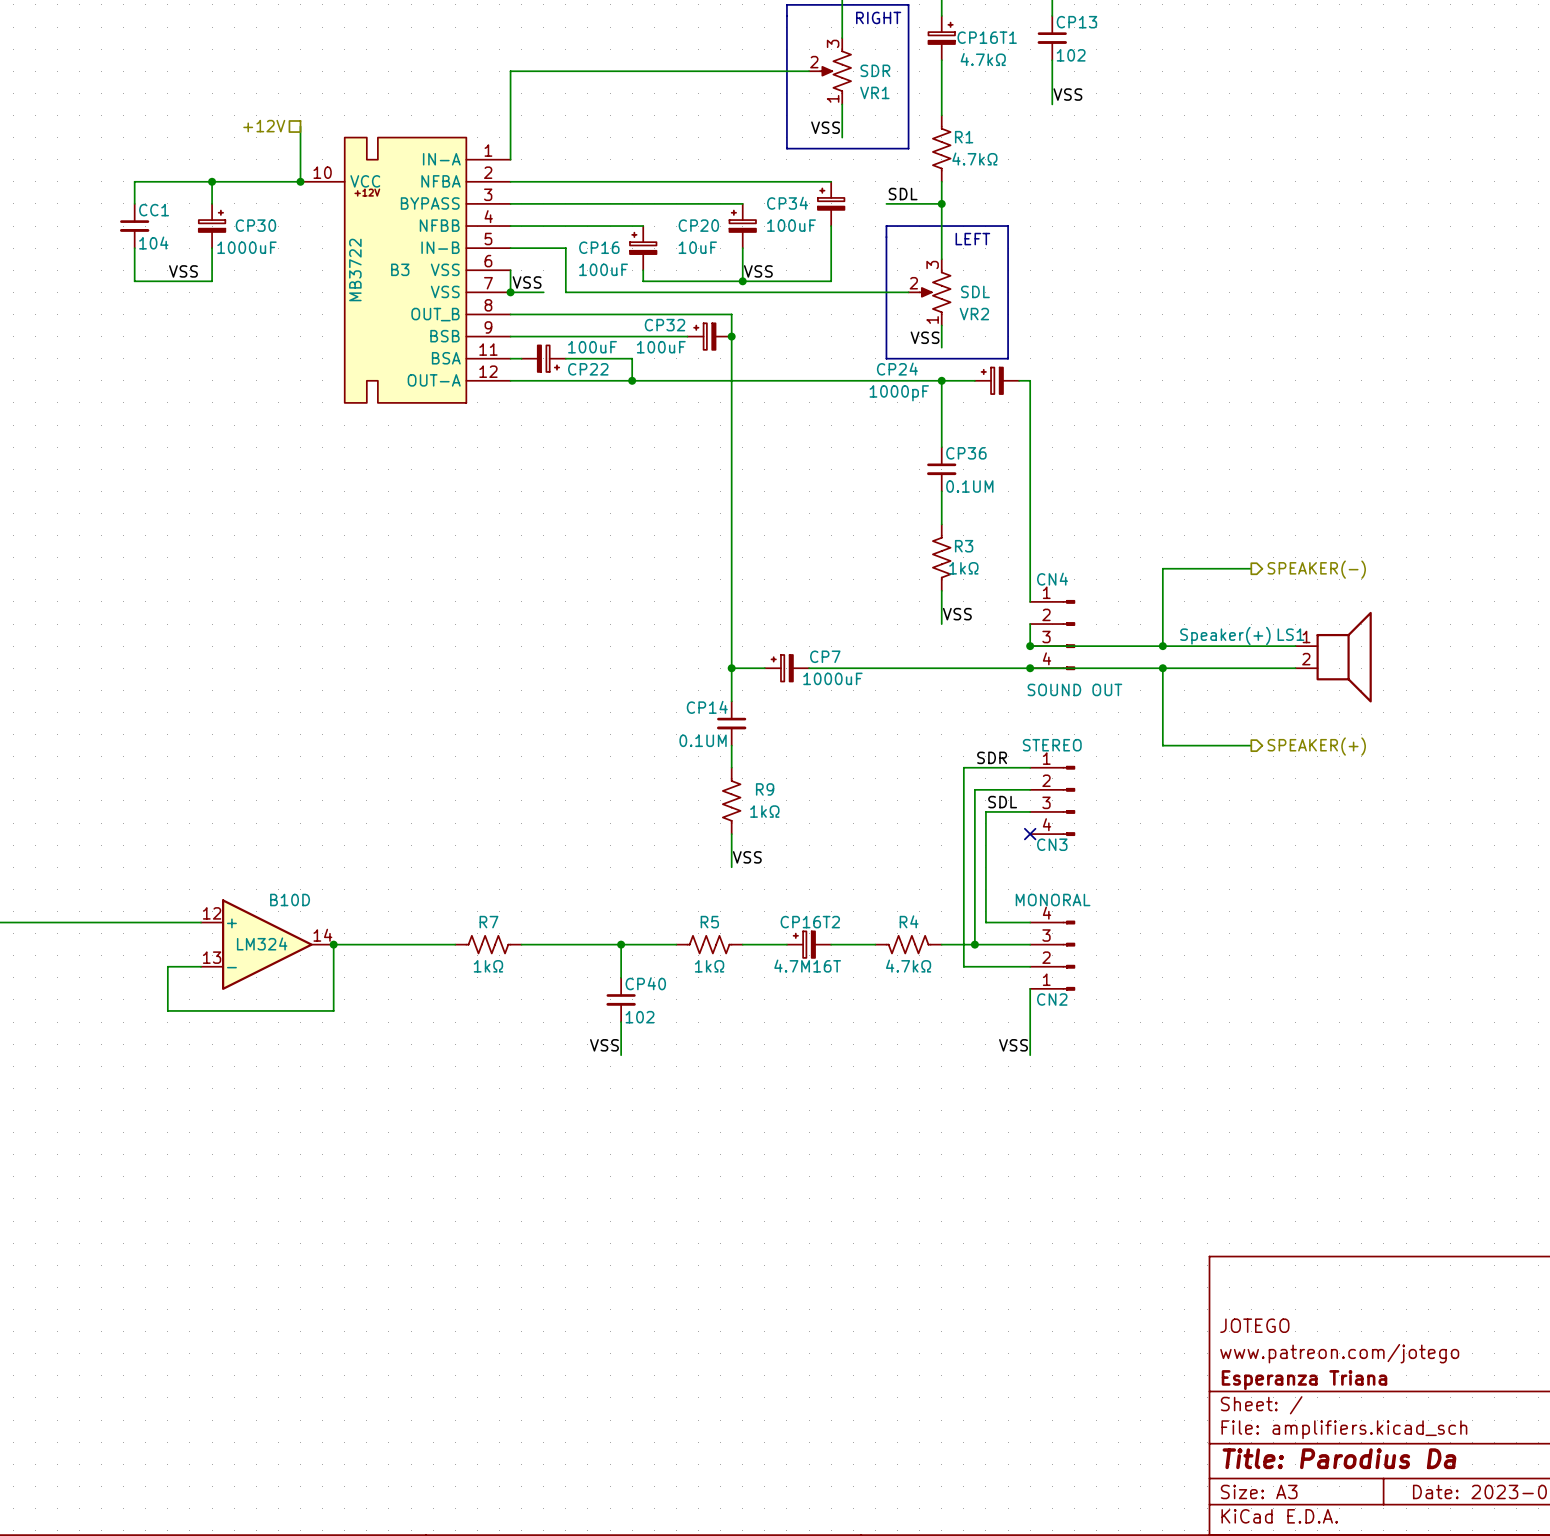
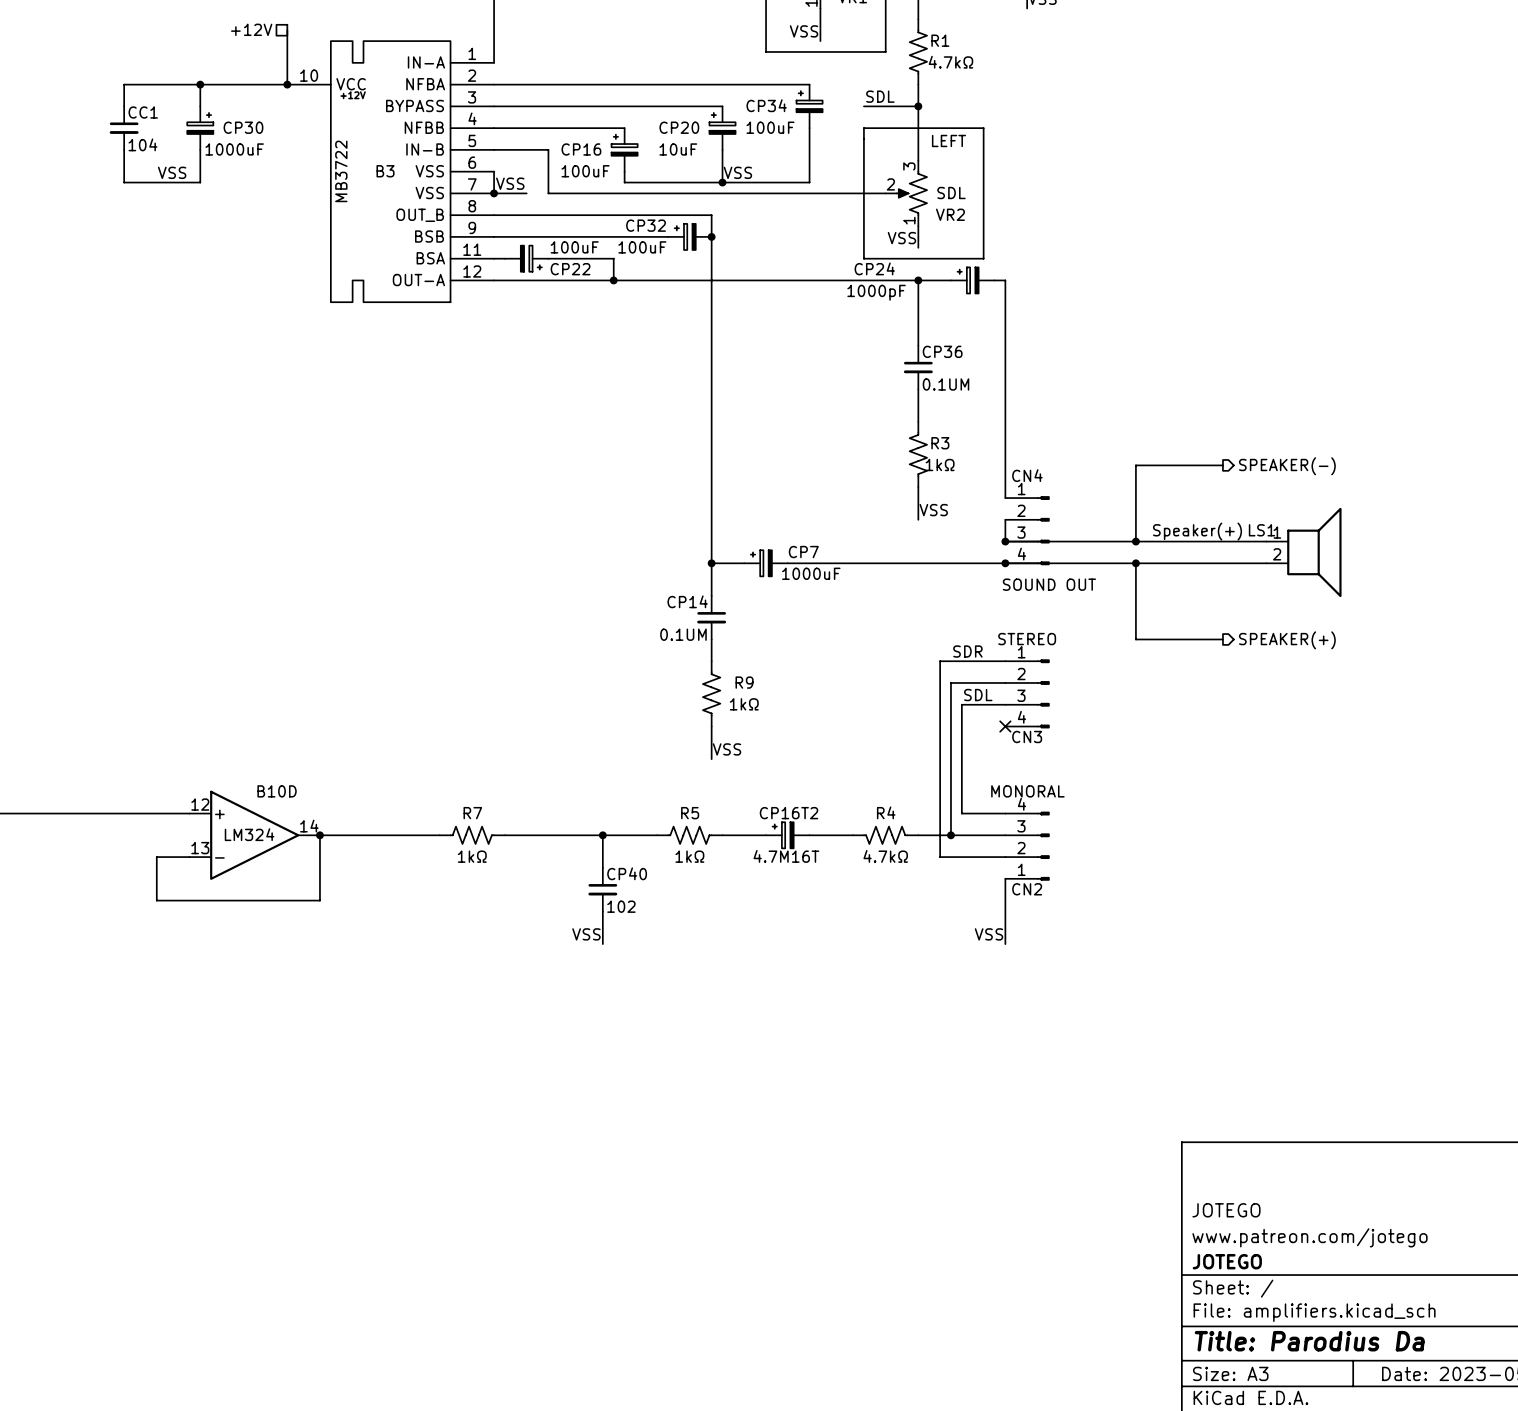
title block: Esperanza Triana (1304, 1380) -> JOTEGO (1227, 1261)

